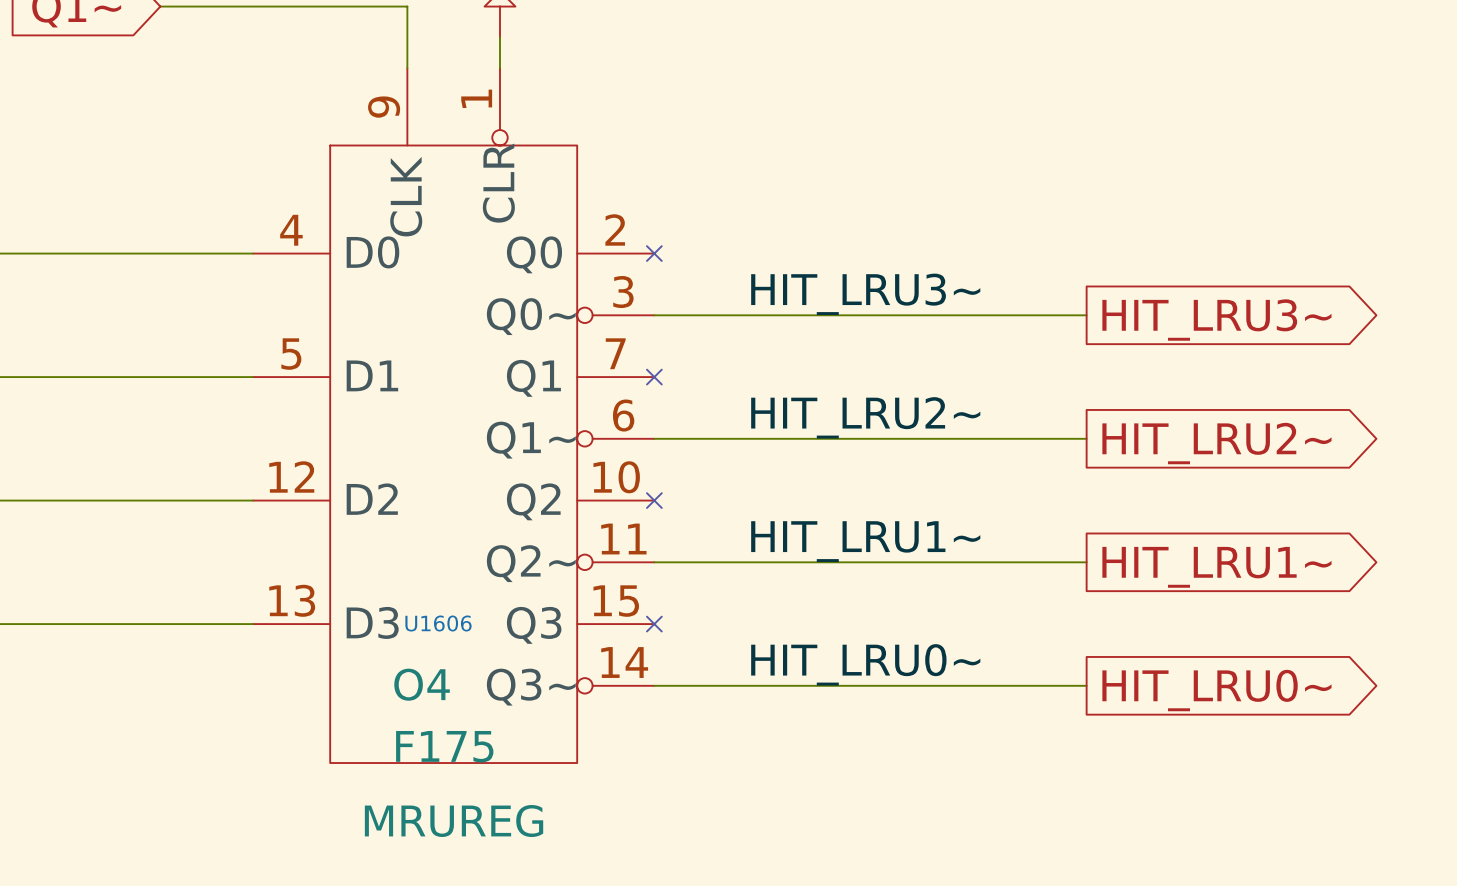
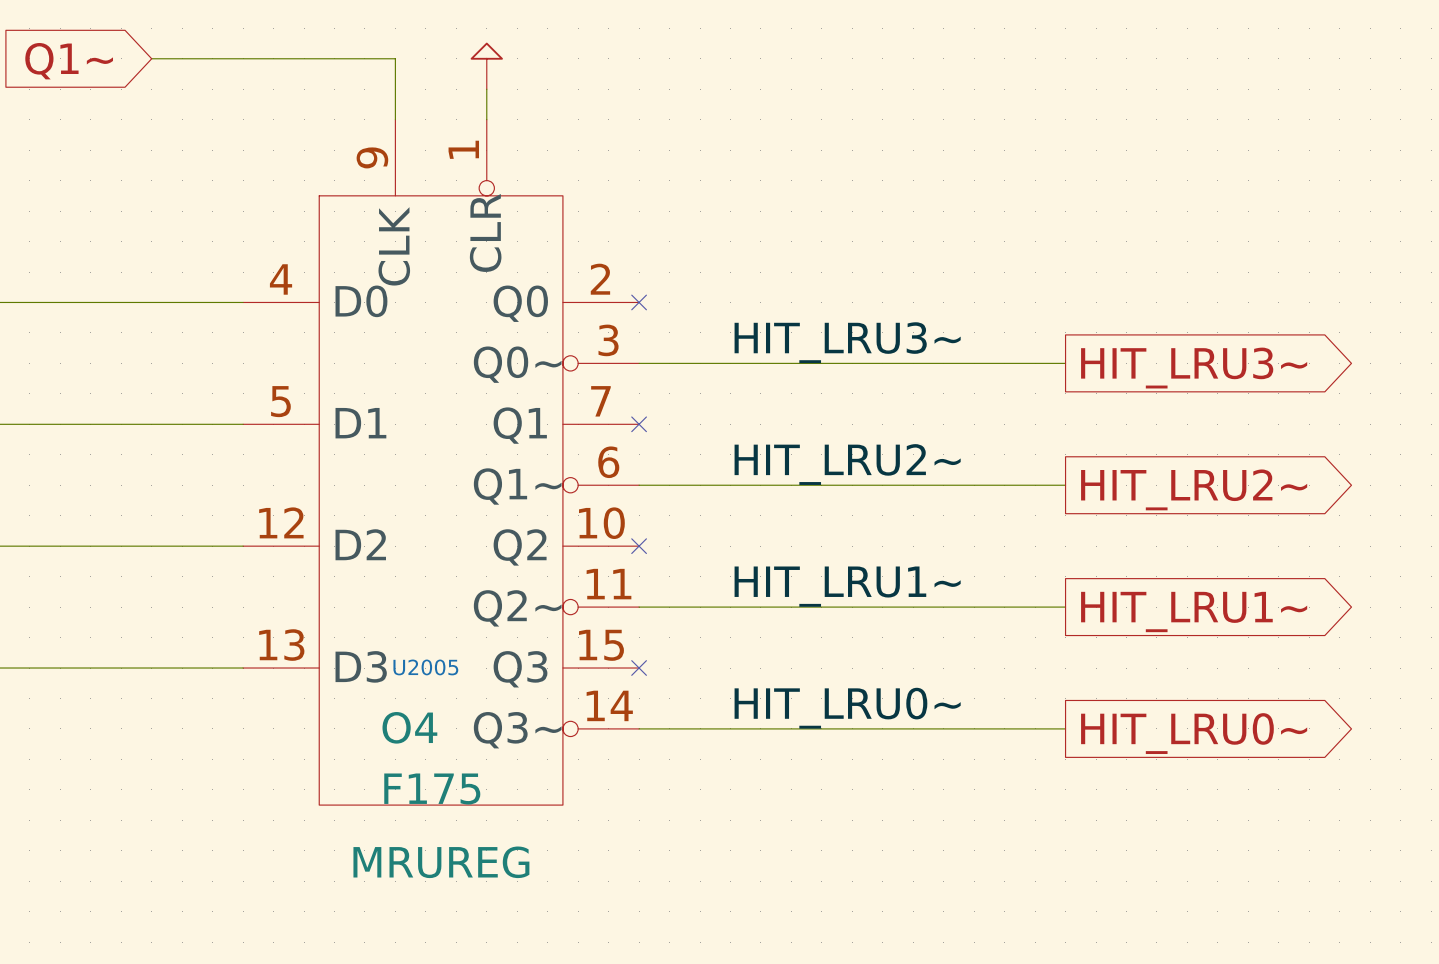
U1606 name: U1606 (438, 623) -> U2005 (425, 667)

